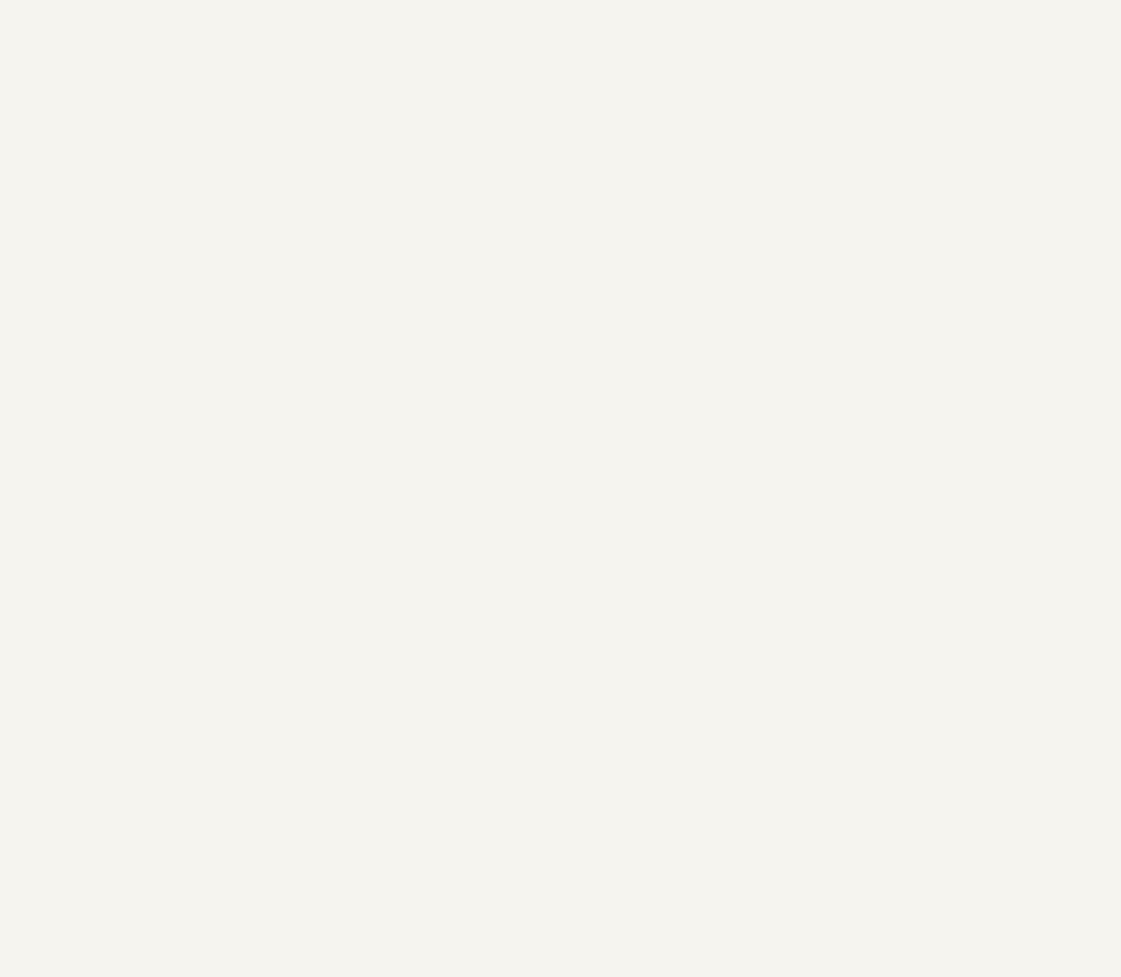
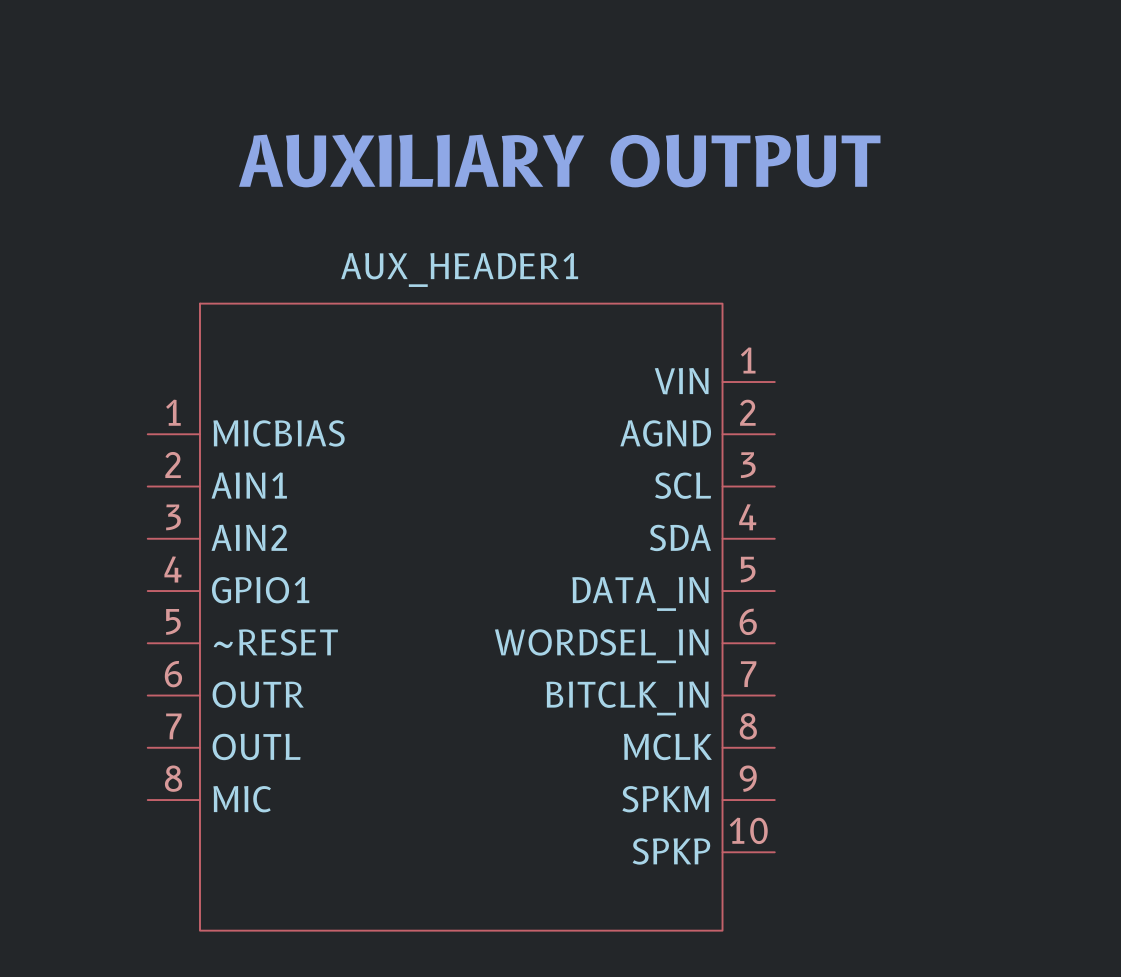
text: none -> AUXILIARY OUTPUT (559, 160)
AUX_HEADER1: none -> (461, 617)

